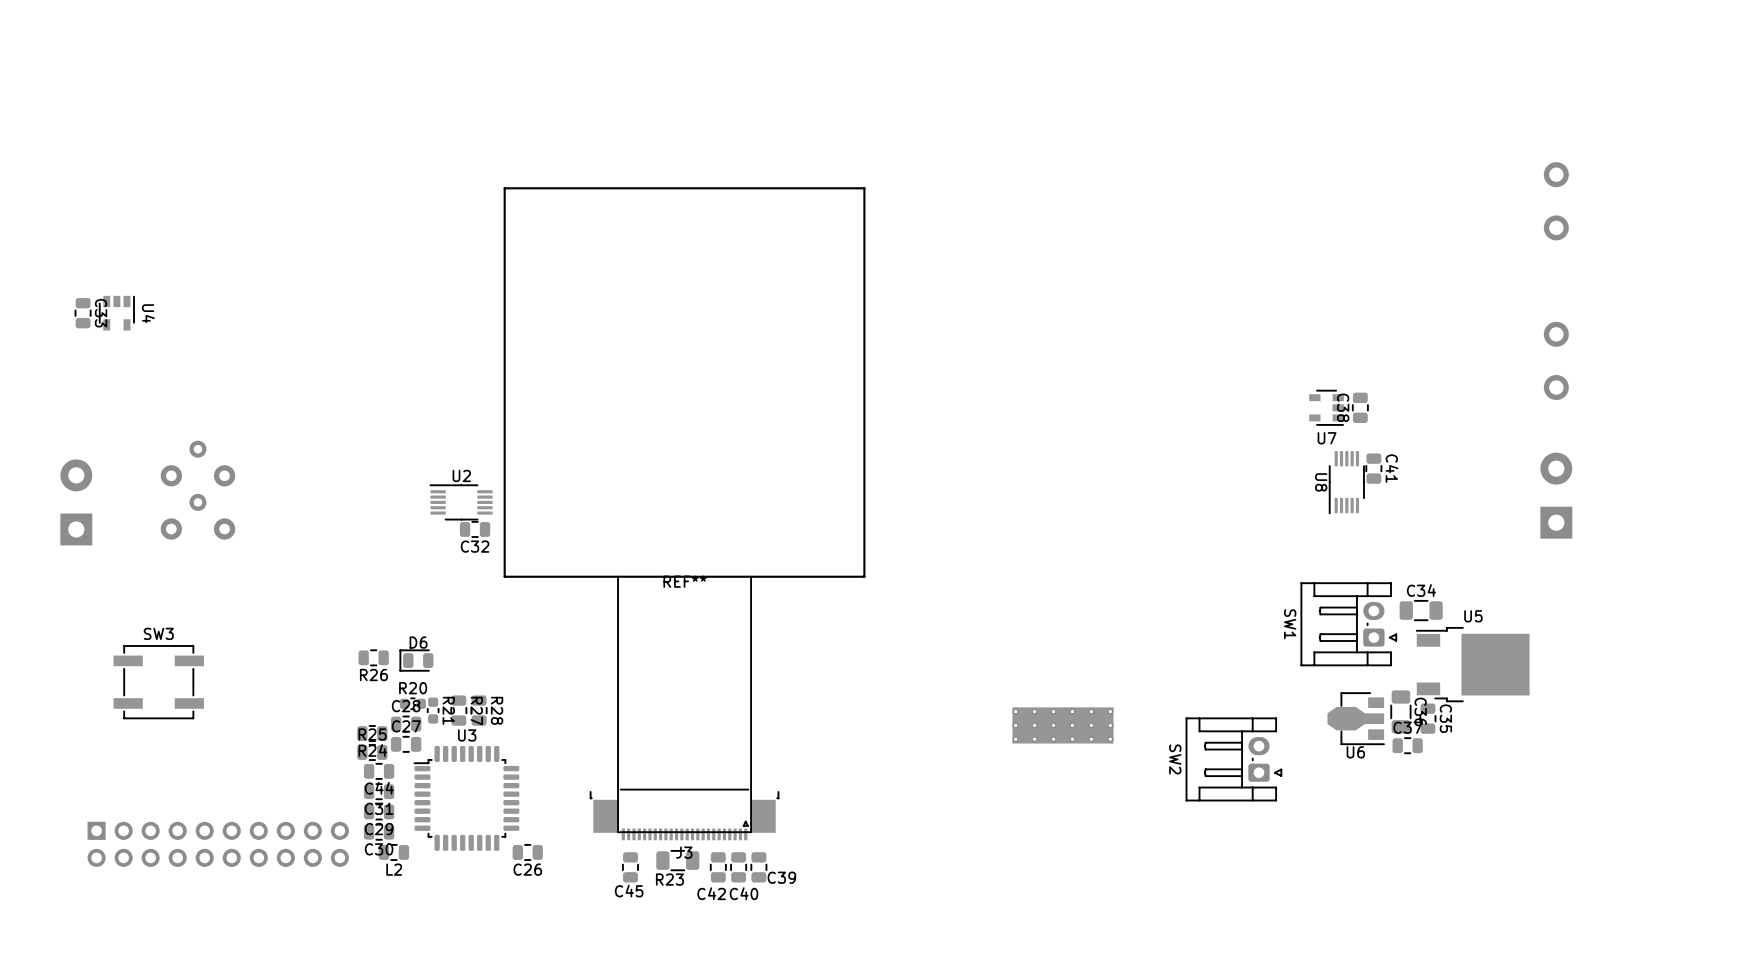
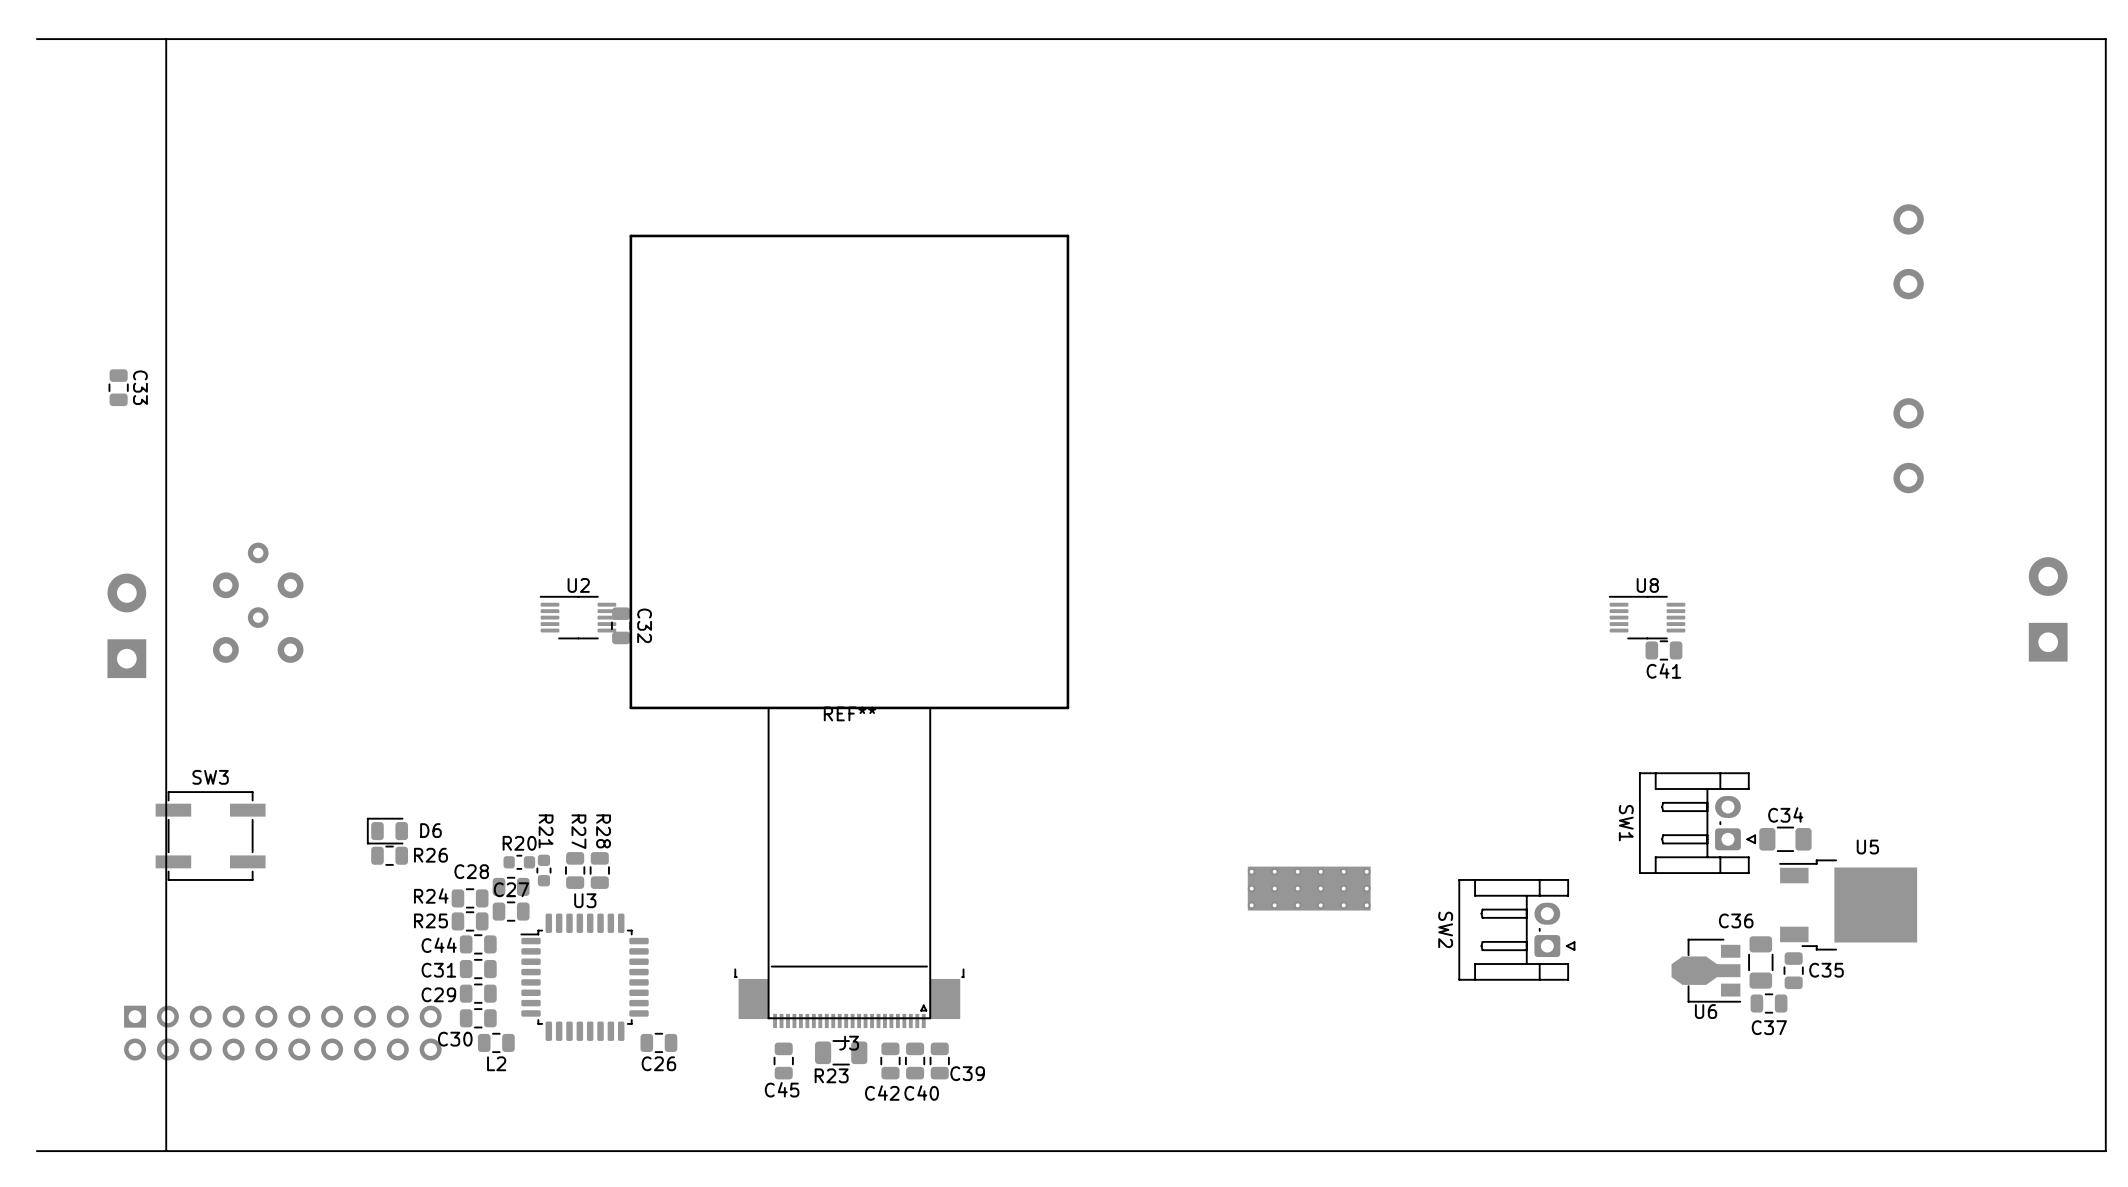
board edge: none -> (36, 39) (2105, 39) (2105, 1151) (36, 1151)
board edge: none -> (166, 39) (166, 1151)
U4: (116, 313) -> none
U7: (1326, 407) -> none
C38: (1360, 407) -> none
C41 rotation: 0° (1373, 468) -> 90° clockwise (1663, 650)
C41 position: (1373, 468) -> (1663, 650)
U8 rotation: 0° (1346, 482) -> 90° clockwise (1647, 617)
part position: (1556, 495) -> (2048, 609)
part position: (76, 502) -> (126, 625)
C32 rotation: 0° (475, 529) -> 90° clockwise (621, 625)
C32 position: (475, 529) -> (621, 625)
C32 name position: C32 (475, 546) -> C32 (644, 625)
C34 position: (1421, 610) -> (1785, 839)
U5 name position: U5 (1473, 616) -> U5 (1867, 847)
SW1 position: (1348, 624) -> (1697, 823)
D6 name position: D6 (418, 642) -> D6 (430, 830)
R26 position: (373, 657) -> (389, 855)
D6 position: (416, 660) -> (387, 831)
U5 position: (1472, 664) -> (1848, 904)
R26 name position: R26 (373, 675) -> R26 (430, 855)
C28 name position: C28 (406, 706) -> C28 (471, 871)
R21 name position: R21 (448, 710) -> R21 (546, 831)
R28 name position: R28 (497, 710) -> R28 (603, 831)
R27 name position: R27 (476, 711) -> R27 (578, 831)
C36 position: (1400, 711) -> (1760, 962)
C36 name rotation: 0° (1420, 711) -> 90° counterclockwise (1736, 920)
C36 name position: C36 (1420, 711) -> C36 (1736, 920)
U6 position: (1356, 718) -> (1706, 970)
C35 position: (1427, 718) -> (1793, 970)
C35 name rotation: 0° (1445, 718) -> 90° counterclockwise (1826, 970)
C37 name position: C37 (1407, 727) -> C37 (1769, 1027)
R25 name position: R25 (372, 734) -> R25 (430, 920)
C37 position: (1407, 745) -> (1769, 1003)
R24 name position: R24 (372, 750) -> R24 (431, 895)
C44 name position: C44 (379, 788) -> C44 (439, 945)
C31 name position: C31 (379, 808) -> C31 (438, 970)
C29 name position: C29 (379, 829) -> C29 (438, 994)
C30 name position: C30 (379, 849) -> C30 (455, 1039)

